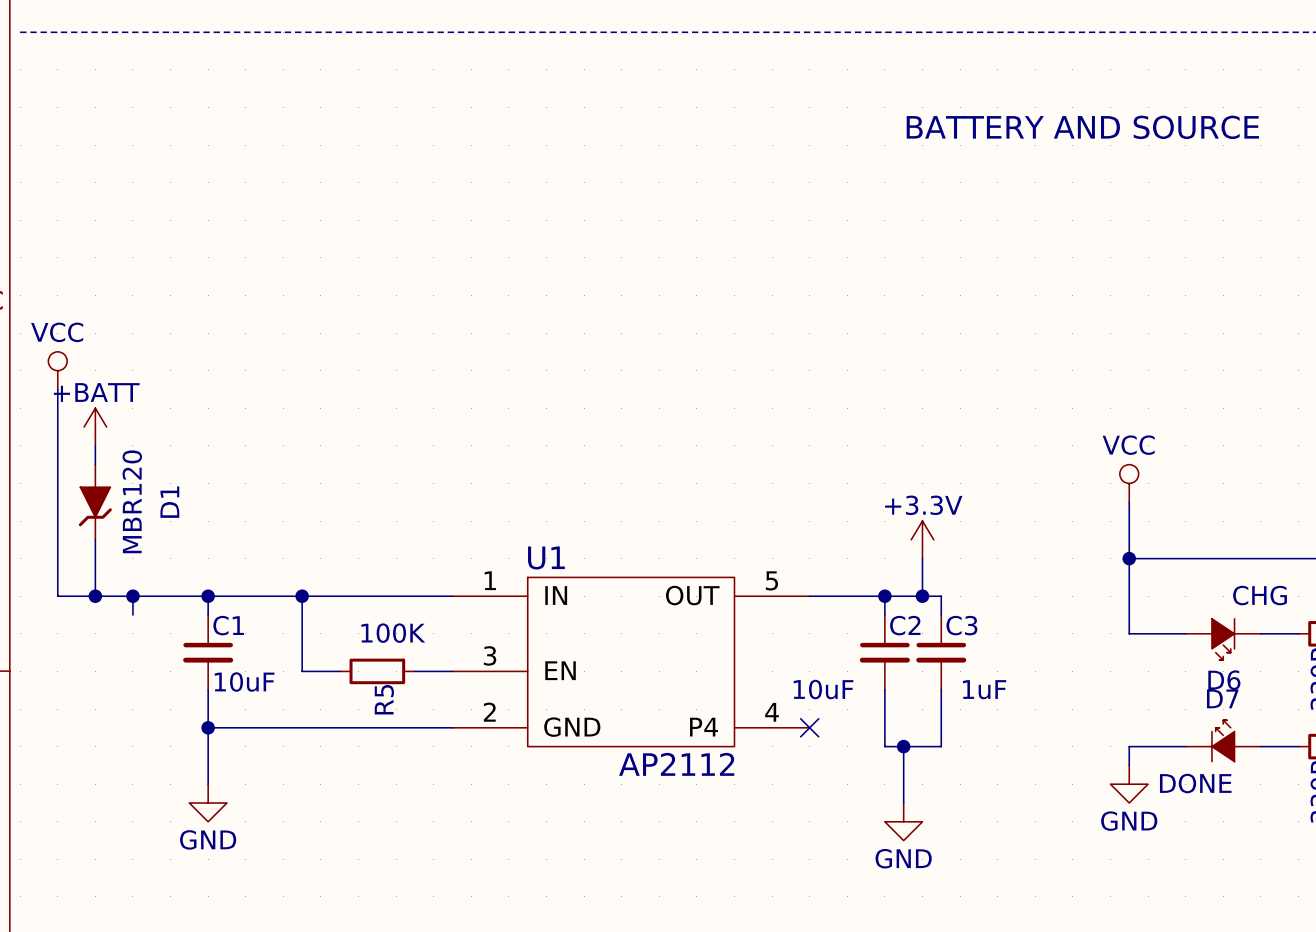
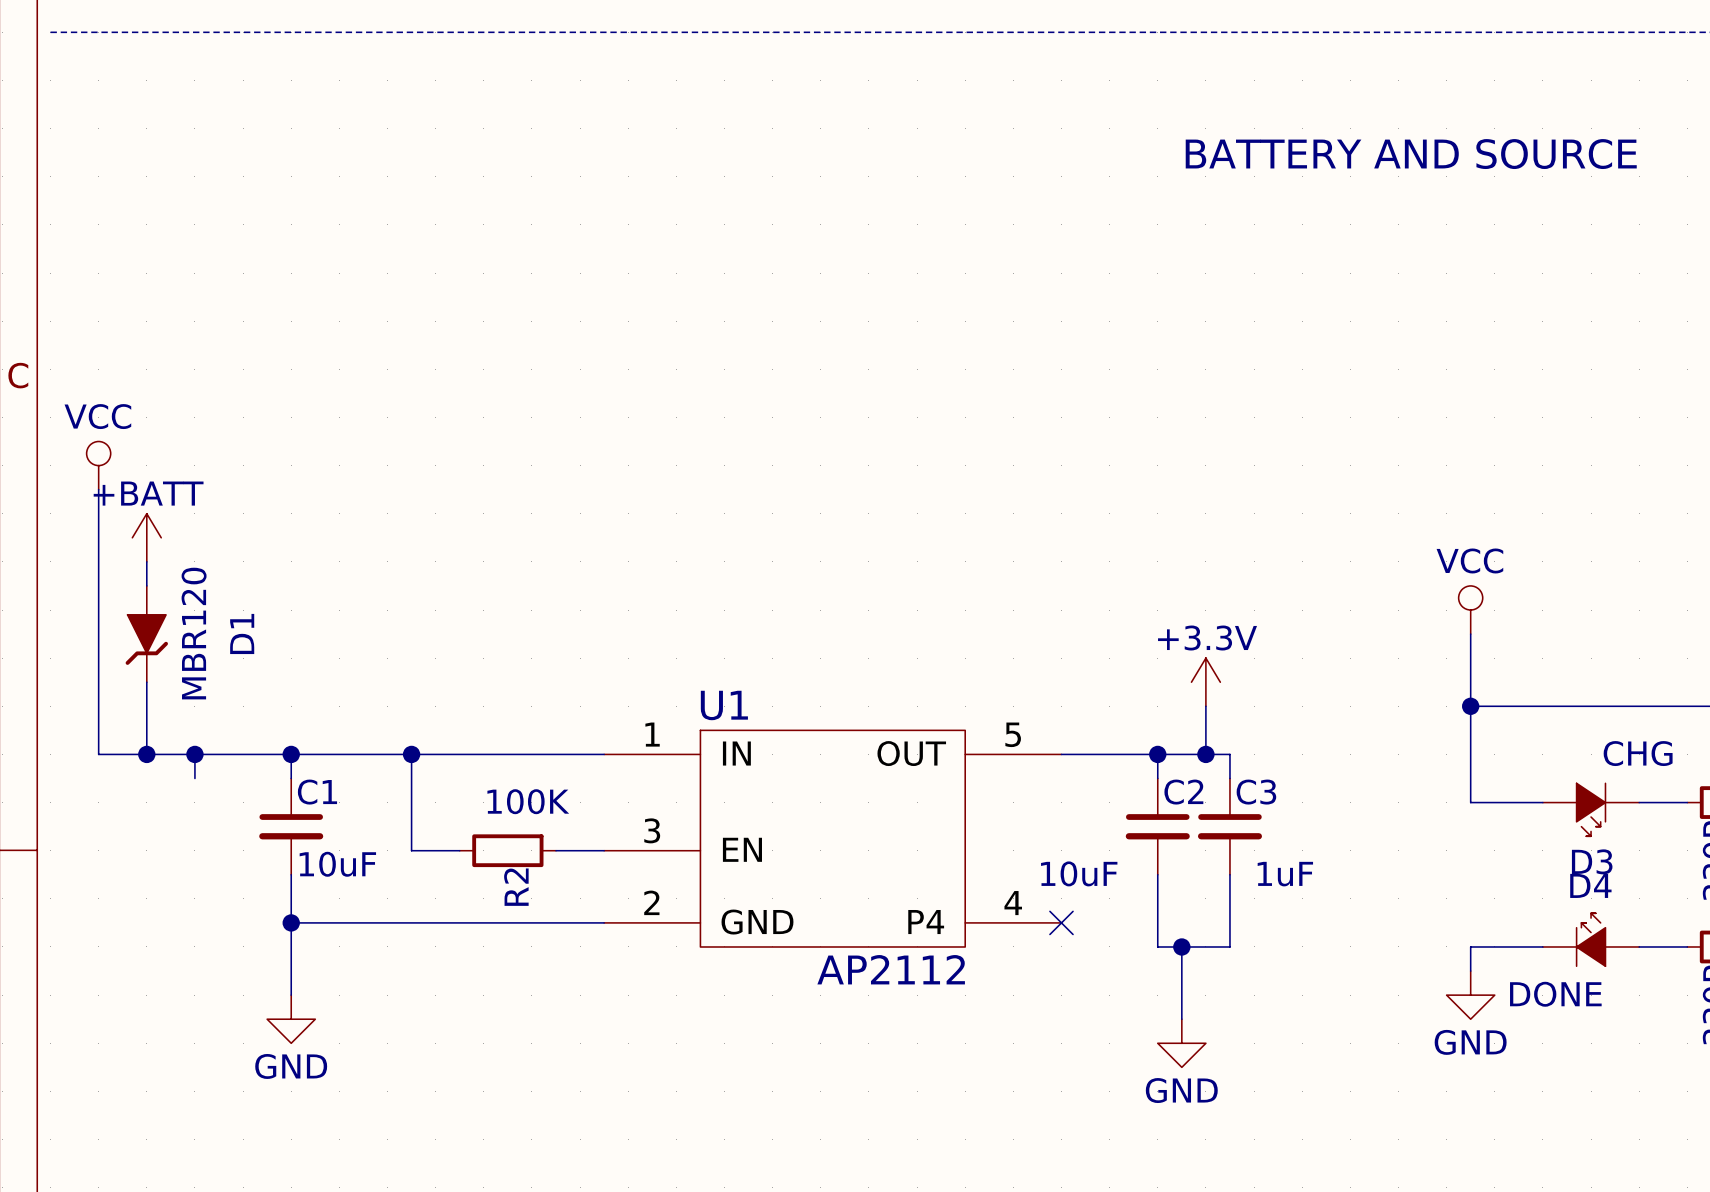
D6 name: D6 (1224, 680) -> D3 (1592, 861)
D7 name: D7 (1222, 698) -> D4 (1590, 885)
R5 name: R5 (384, 699) -> R2 (516, 887)

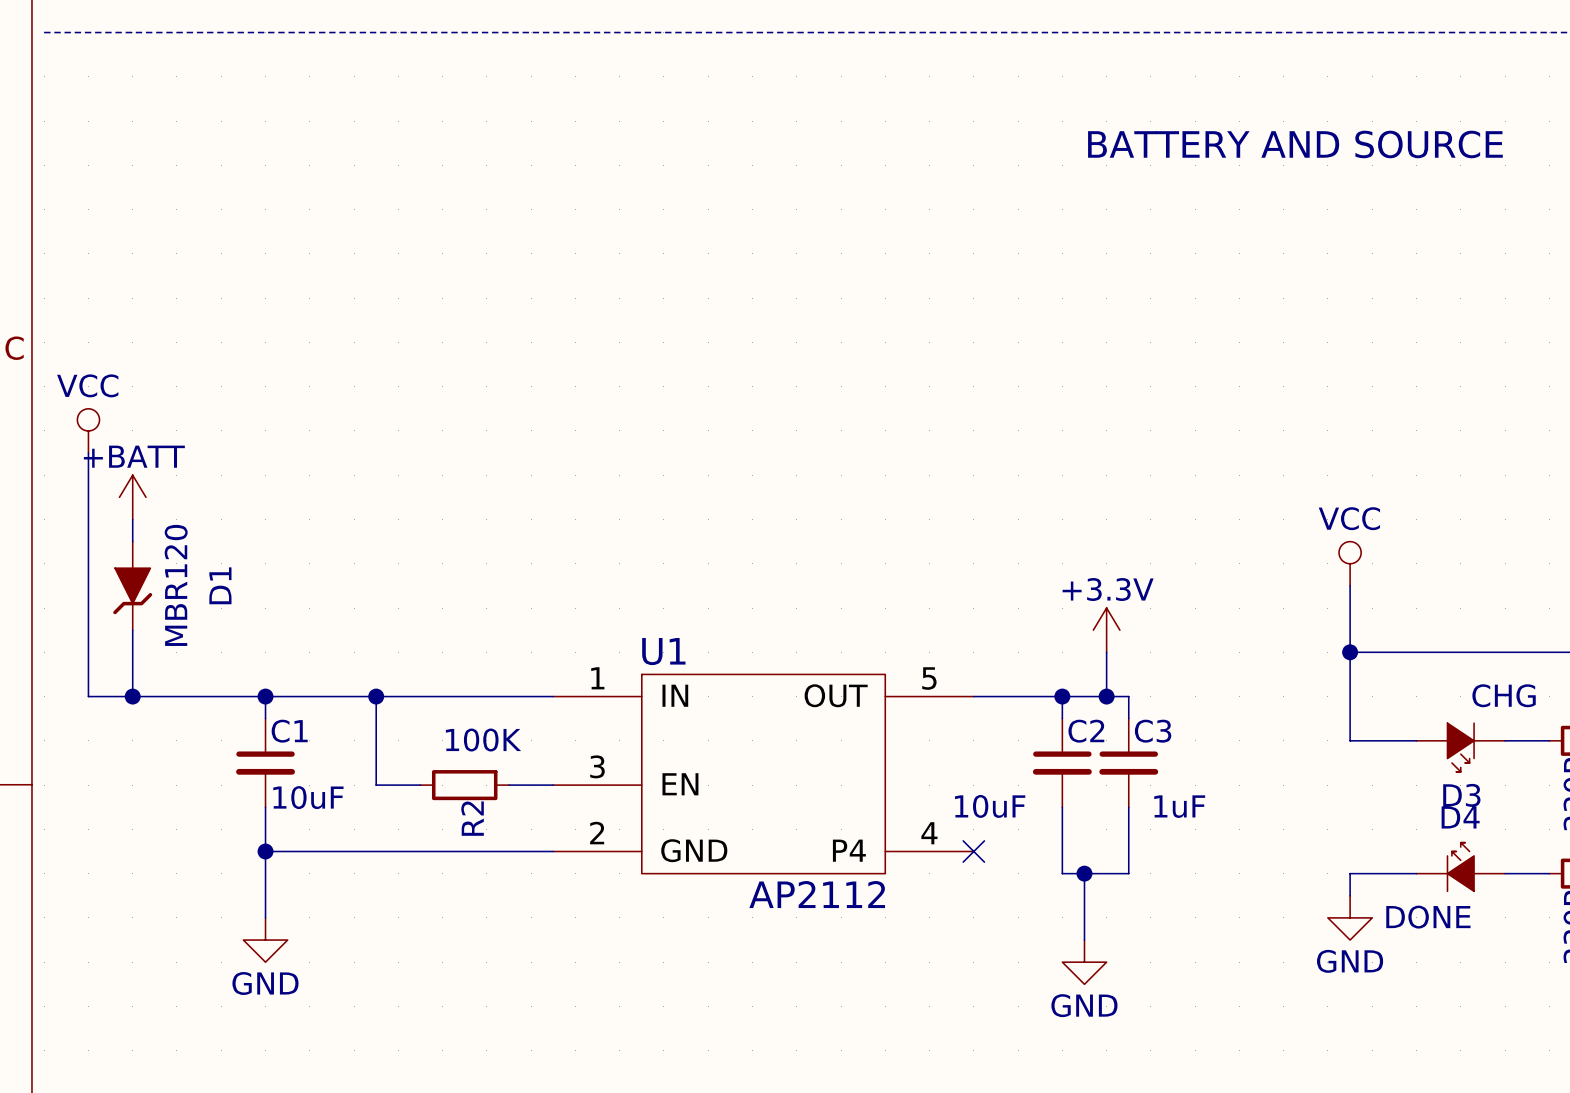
wire: (194, 754) (194, 778) -> none
junction: (194, 754) -> none

